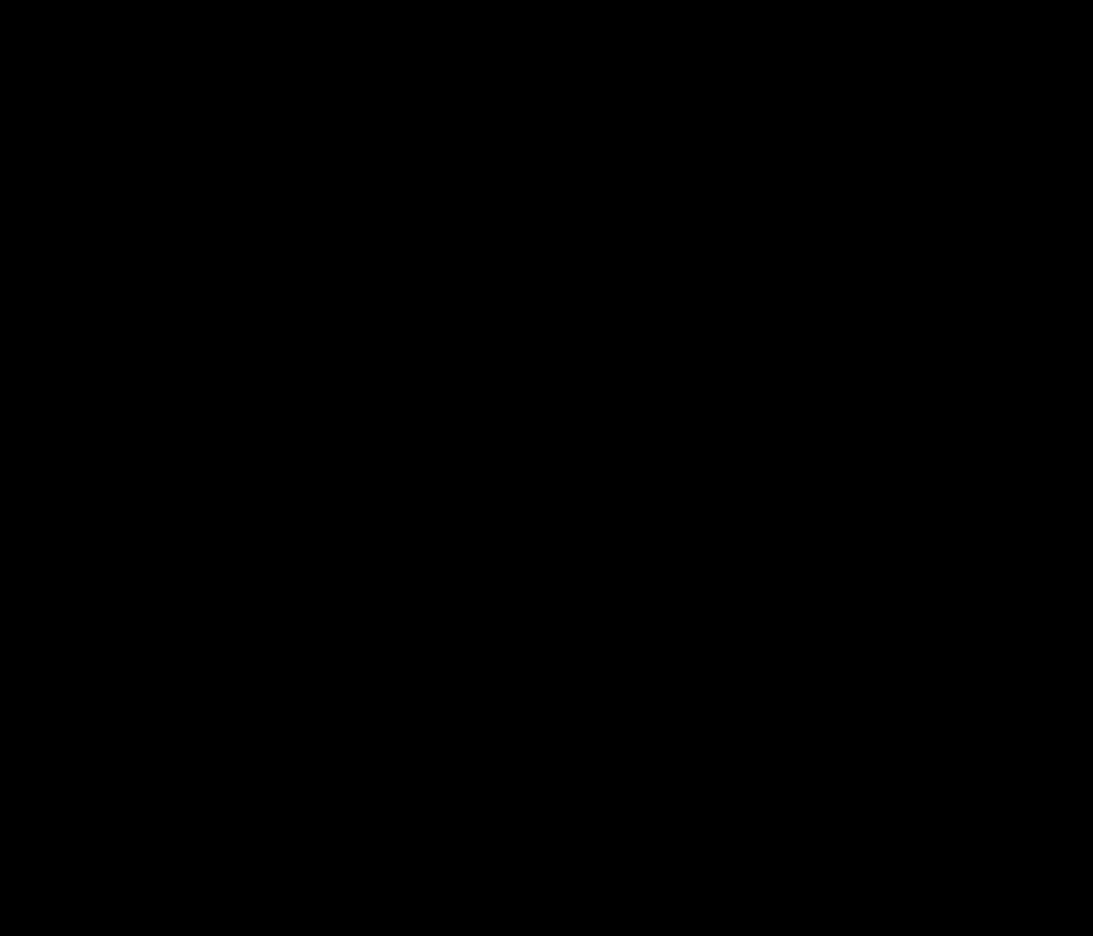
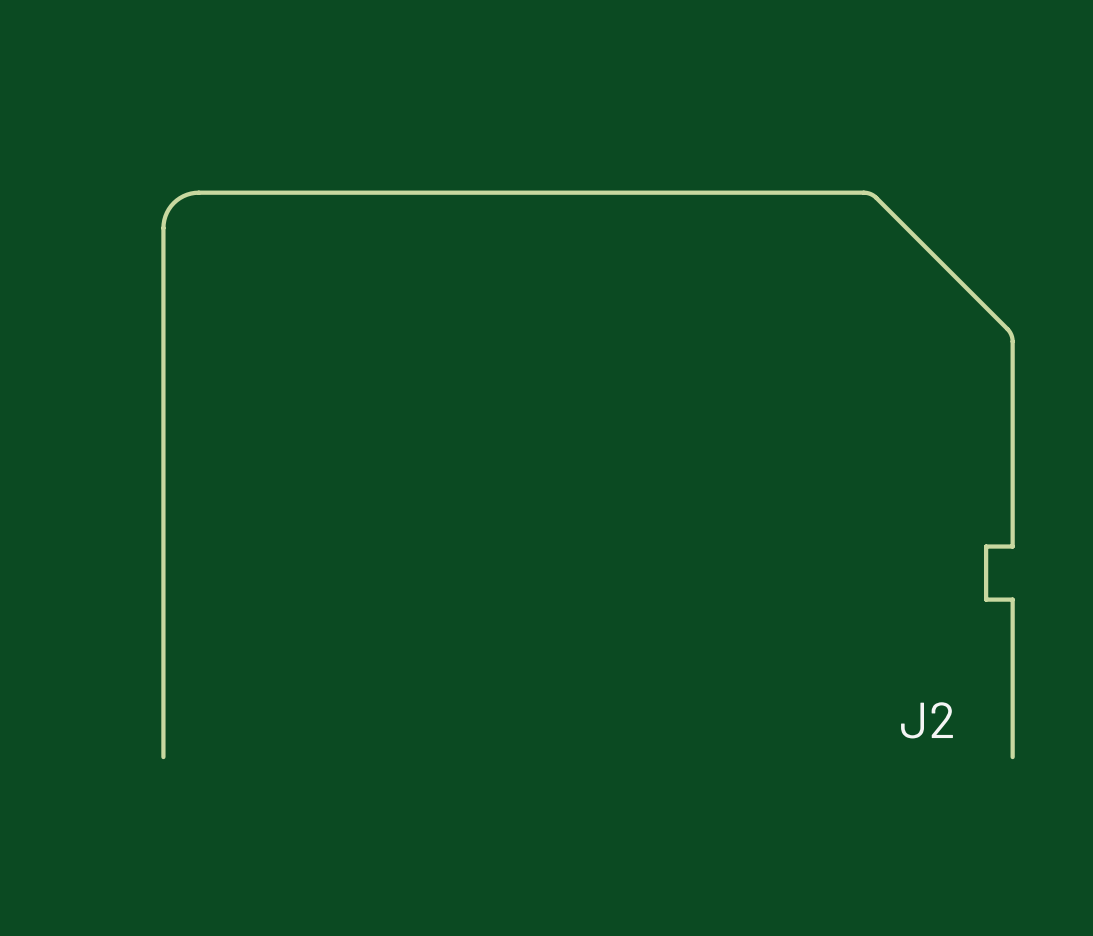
J2: none -> (588, 474)

